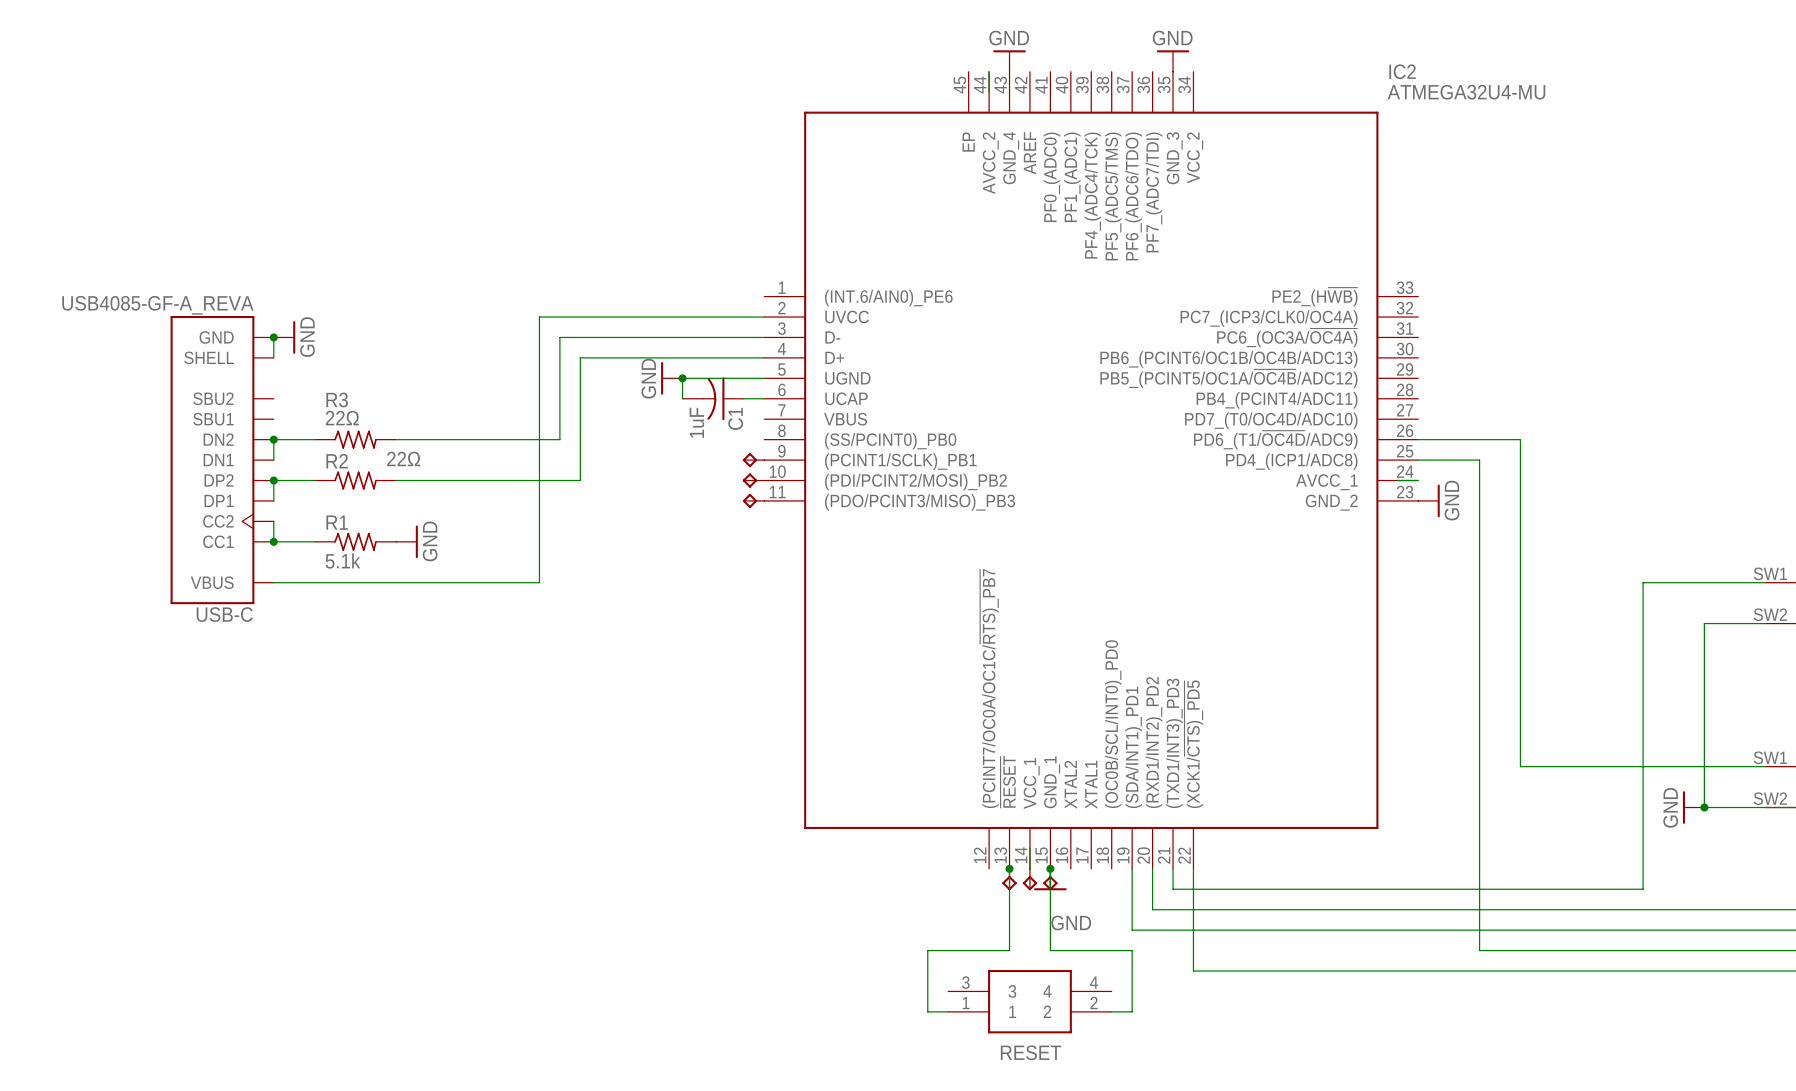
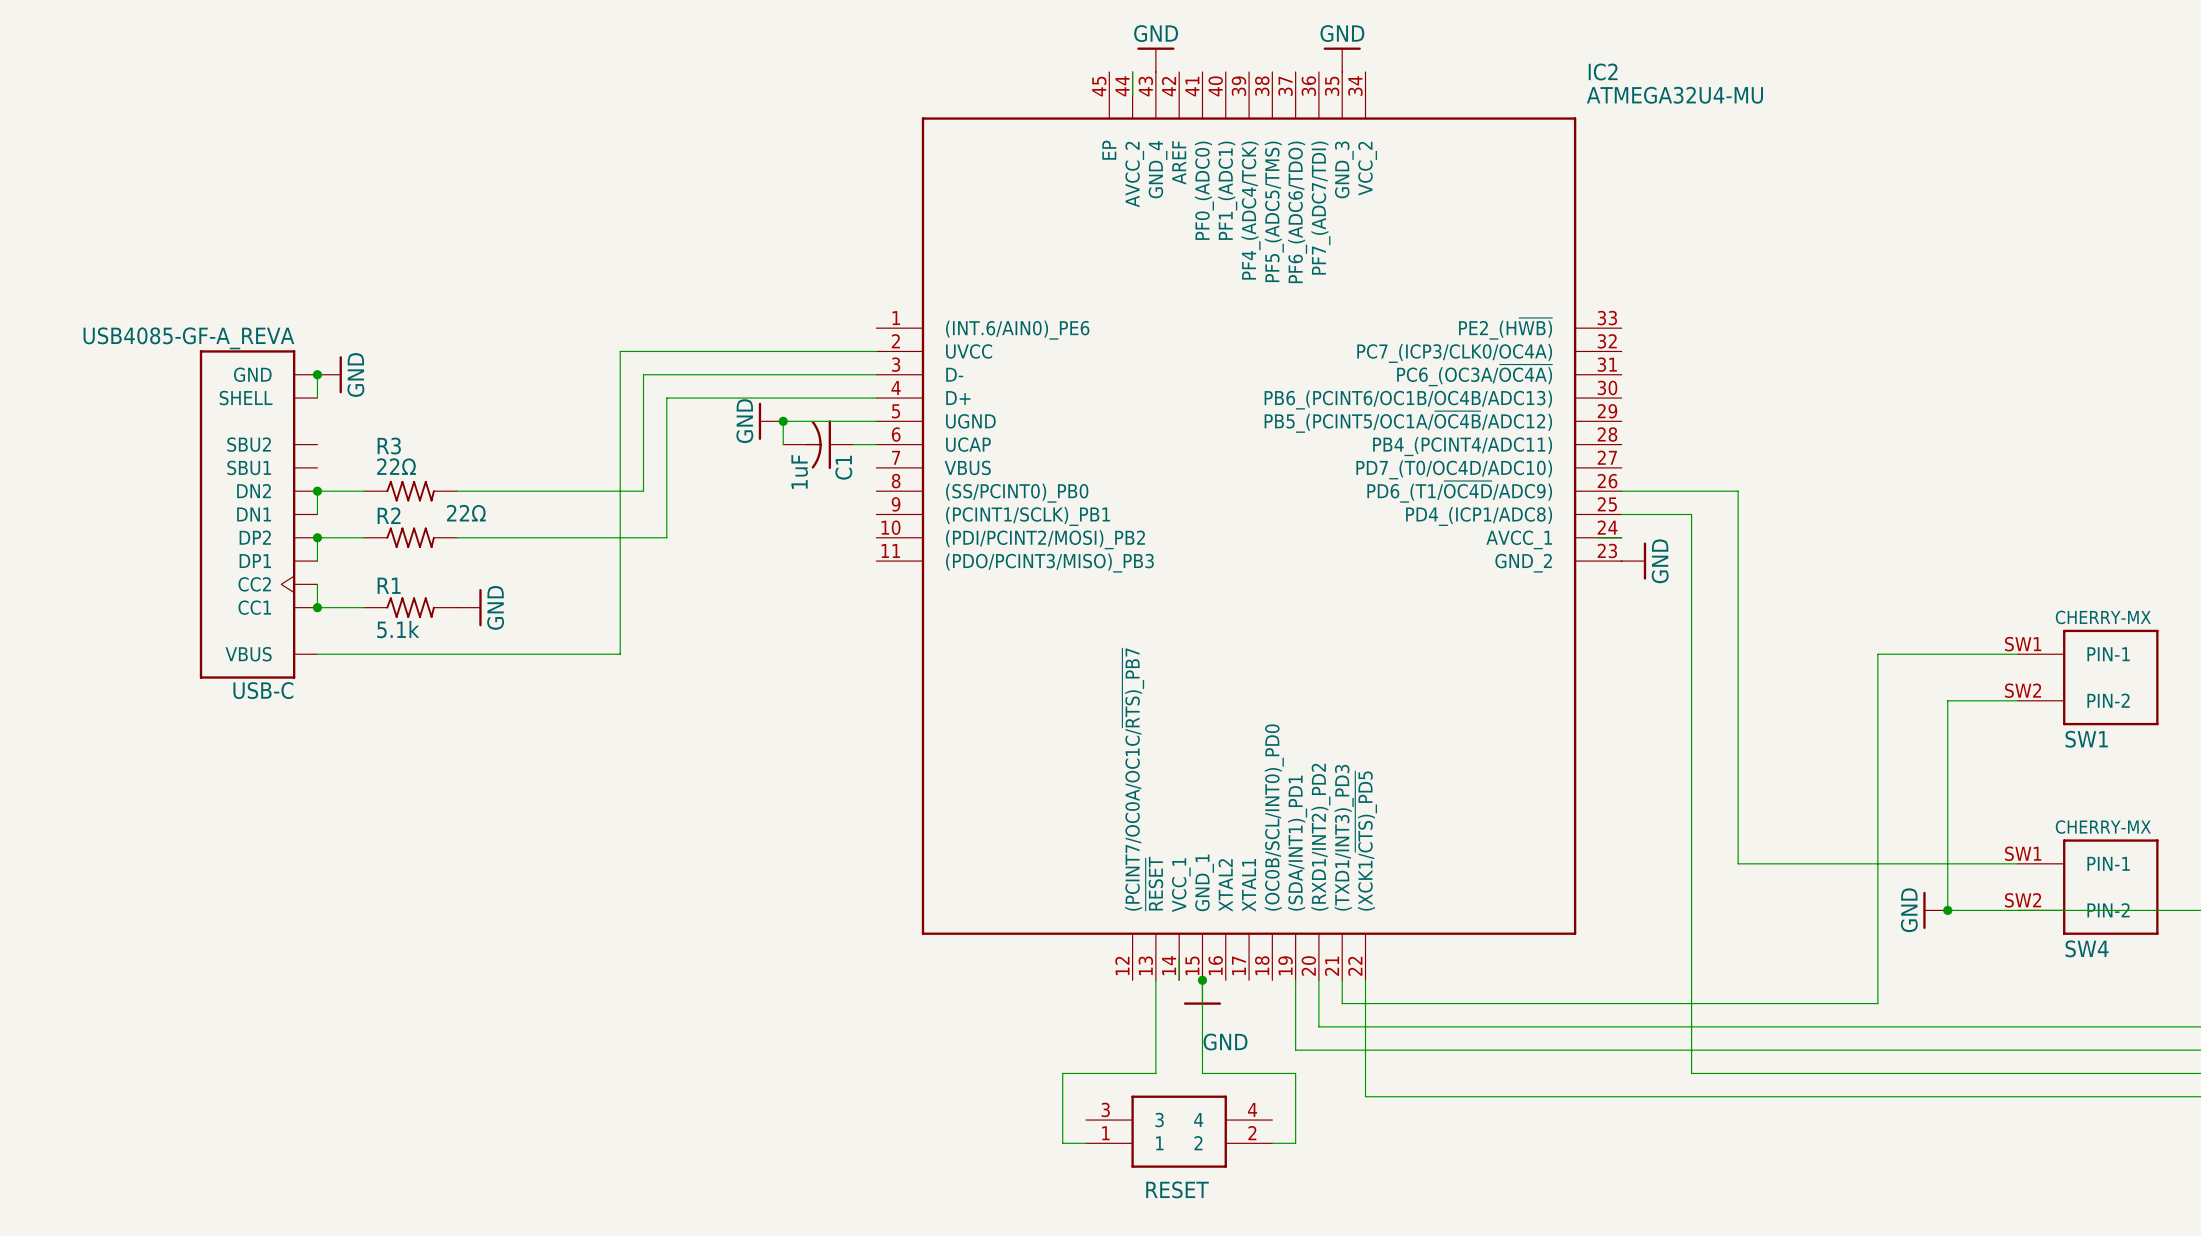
part: (753, 460) -> none
part: (753, 480) -> none
part: (753, 500) -> none
junction: (1009, 868) -> none
part: (1009, 879) -> none
part: (1029, 879) -> none
part: (1050, 879) -> none

